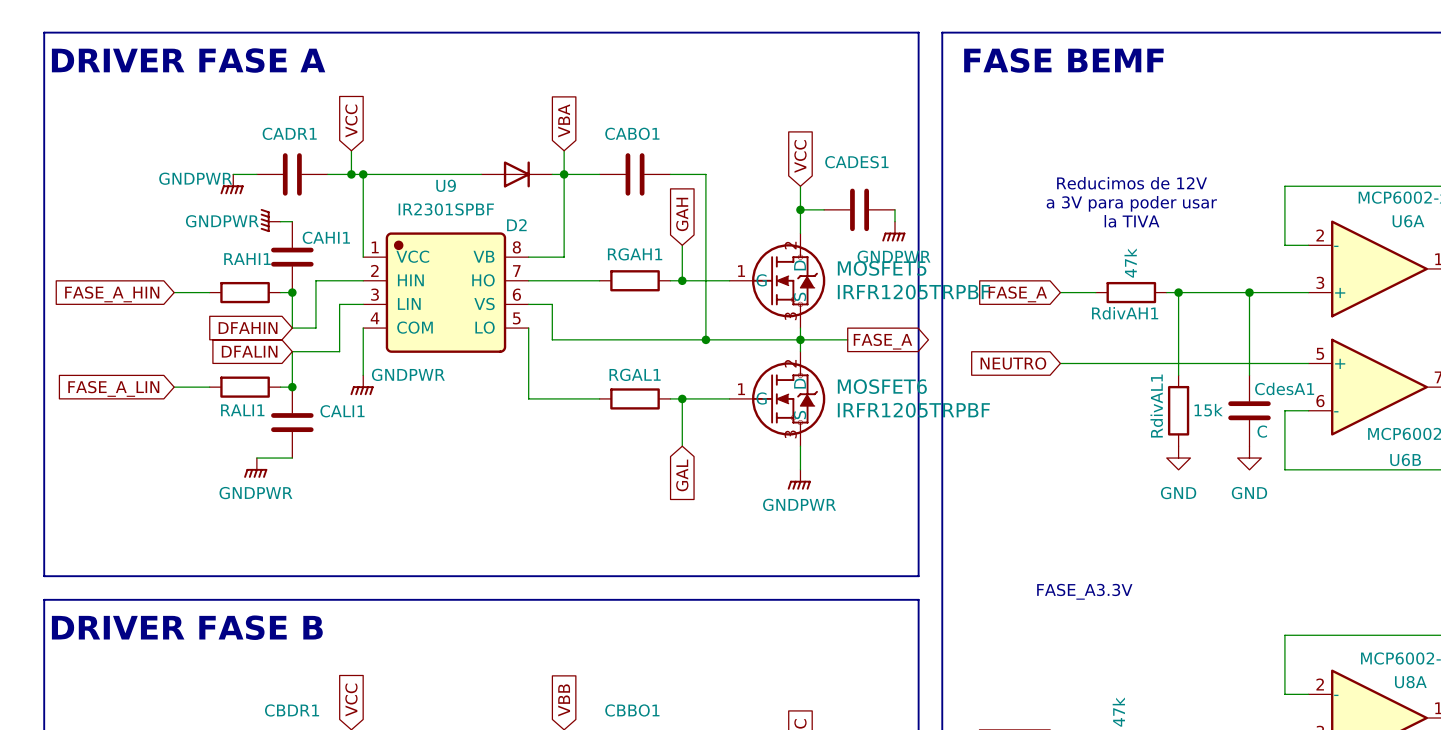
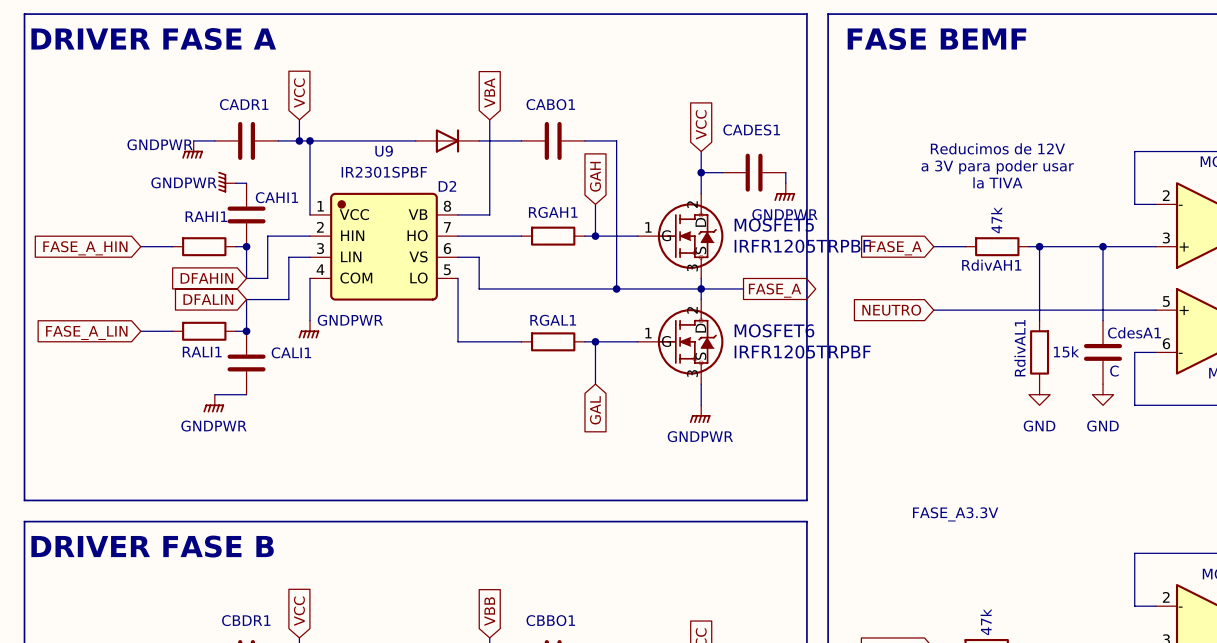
junction: (564, 174) -> none

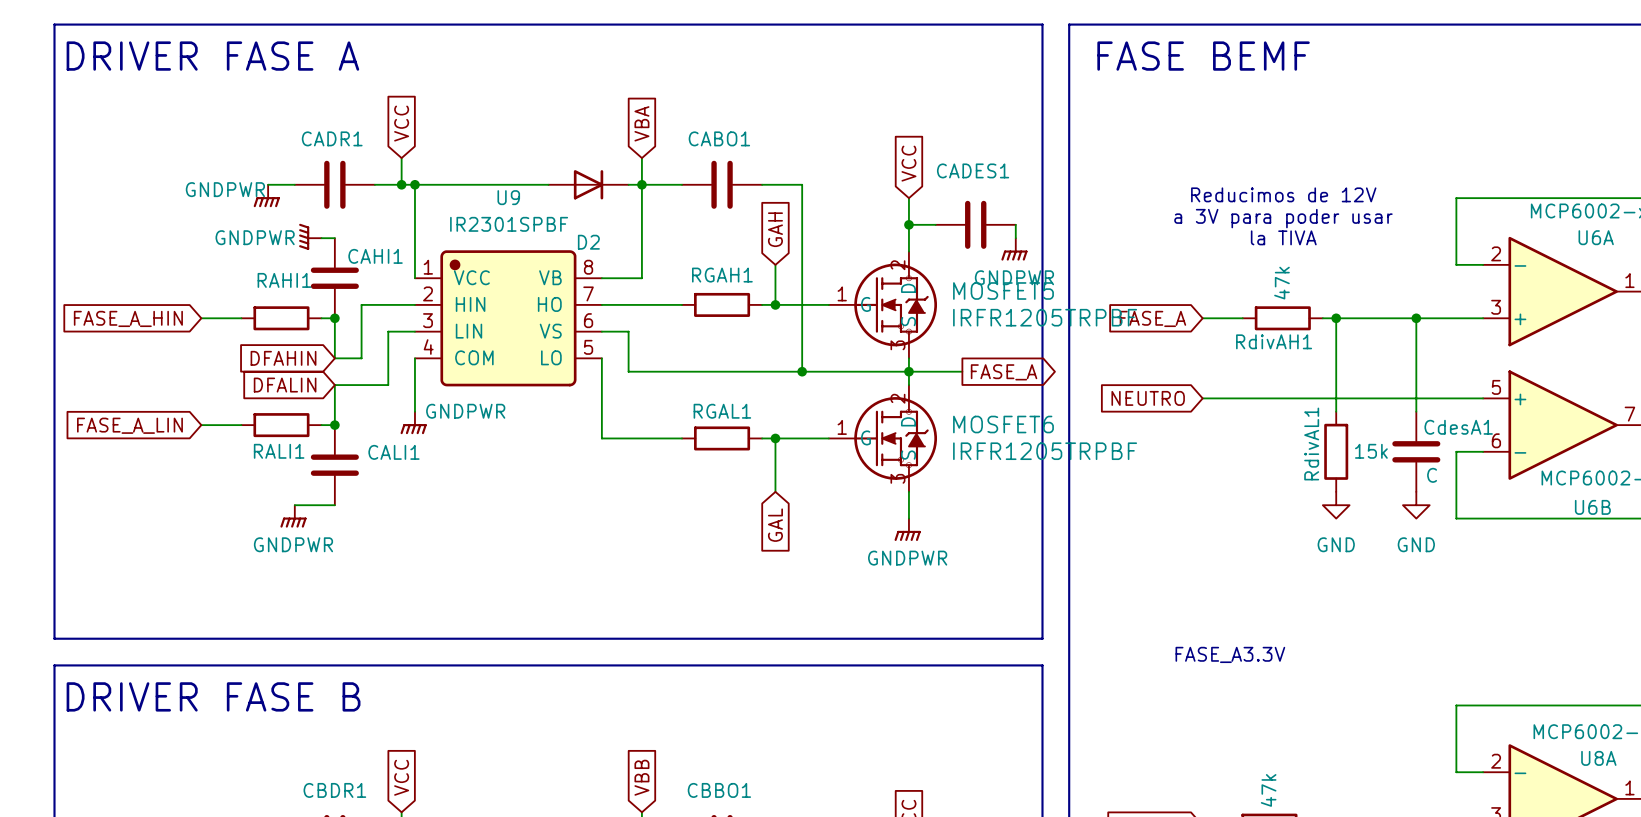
junction: none -> (641, 184)

